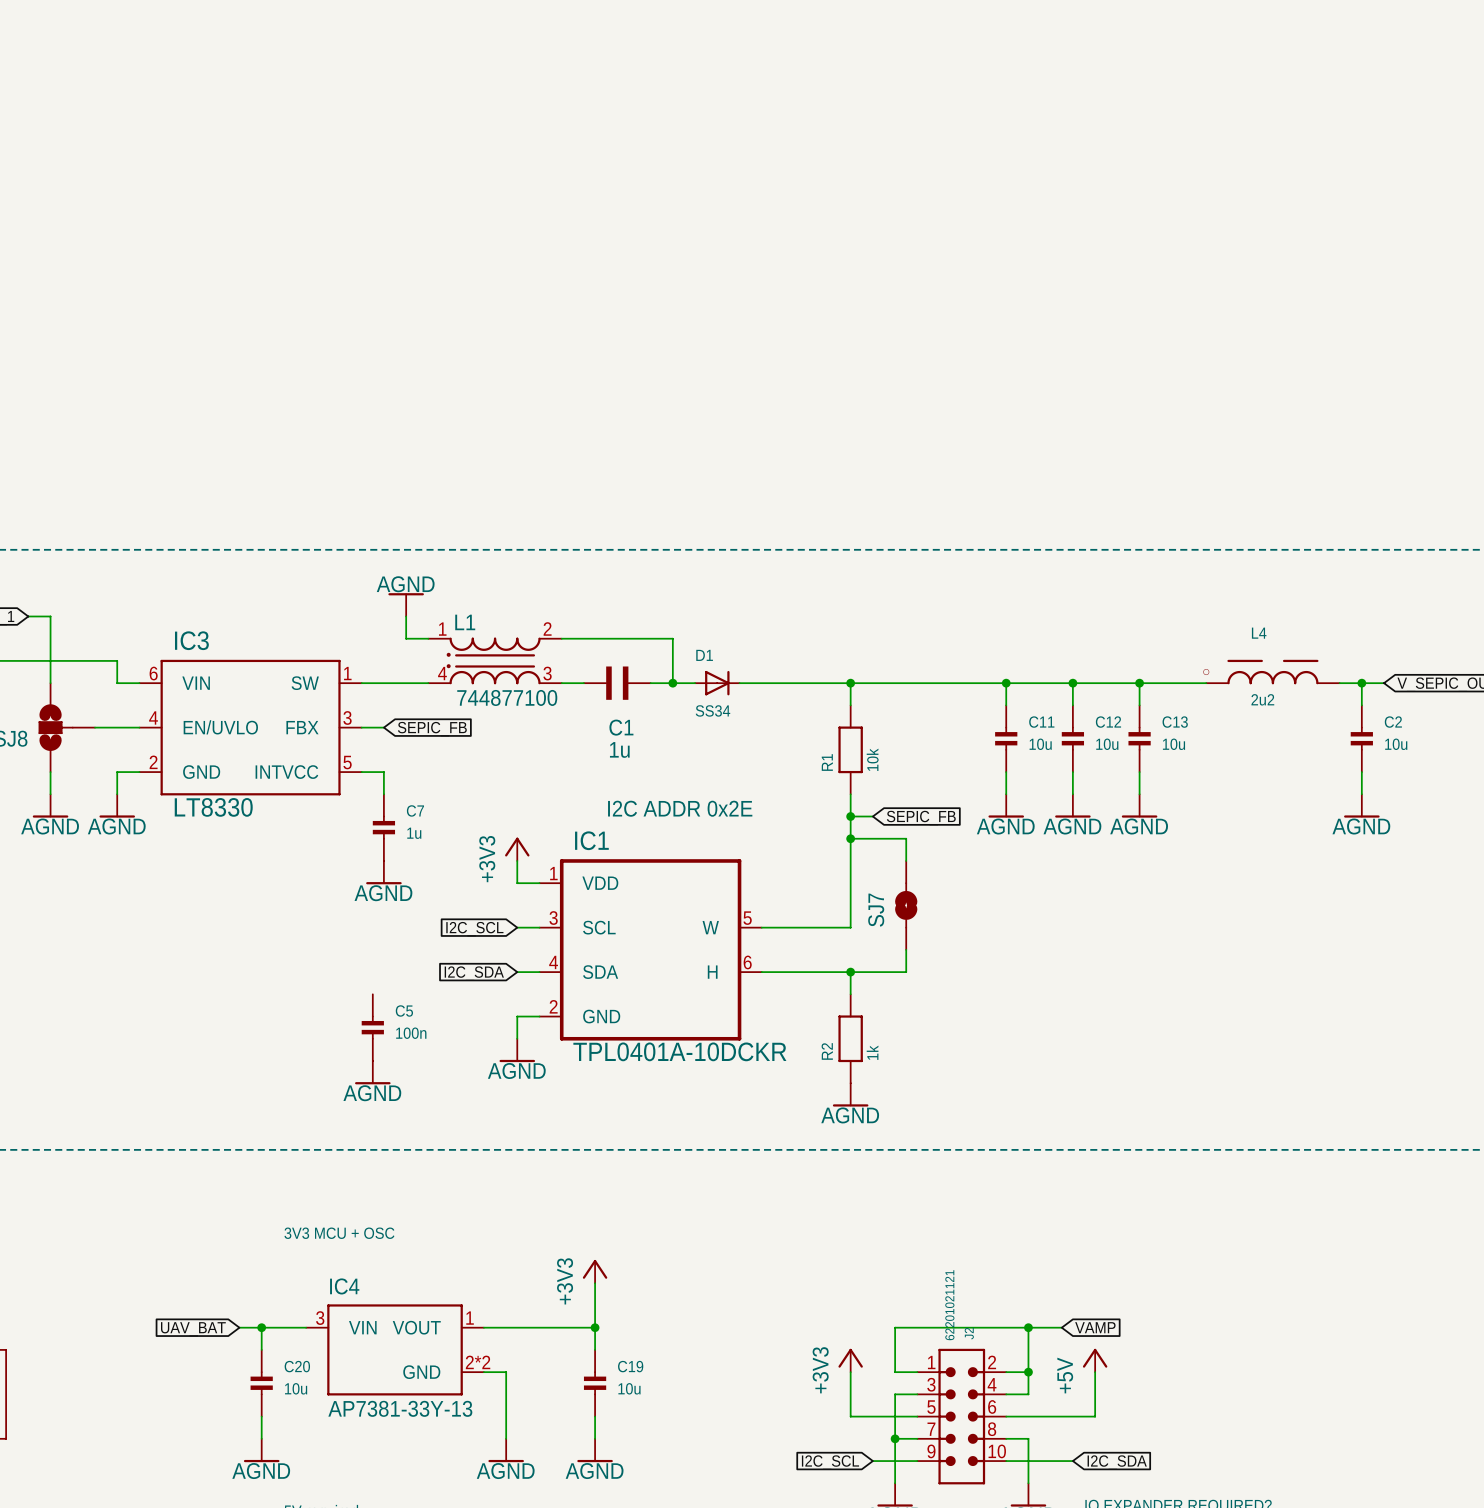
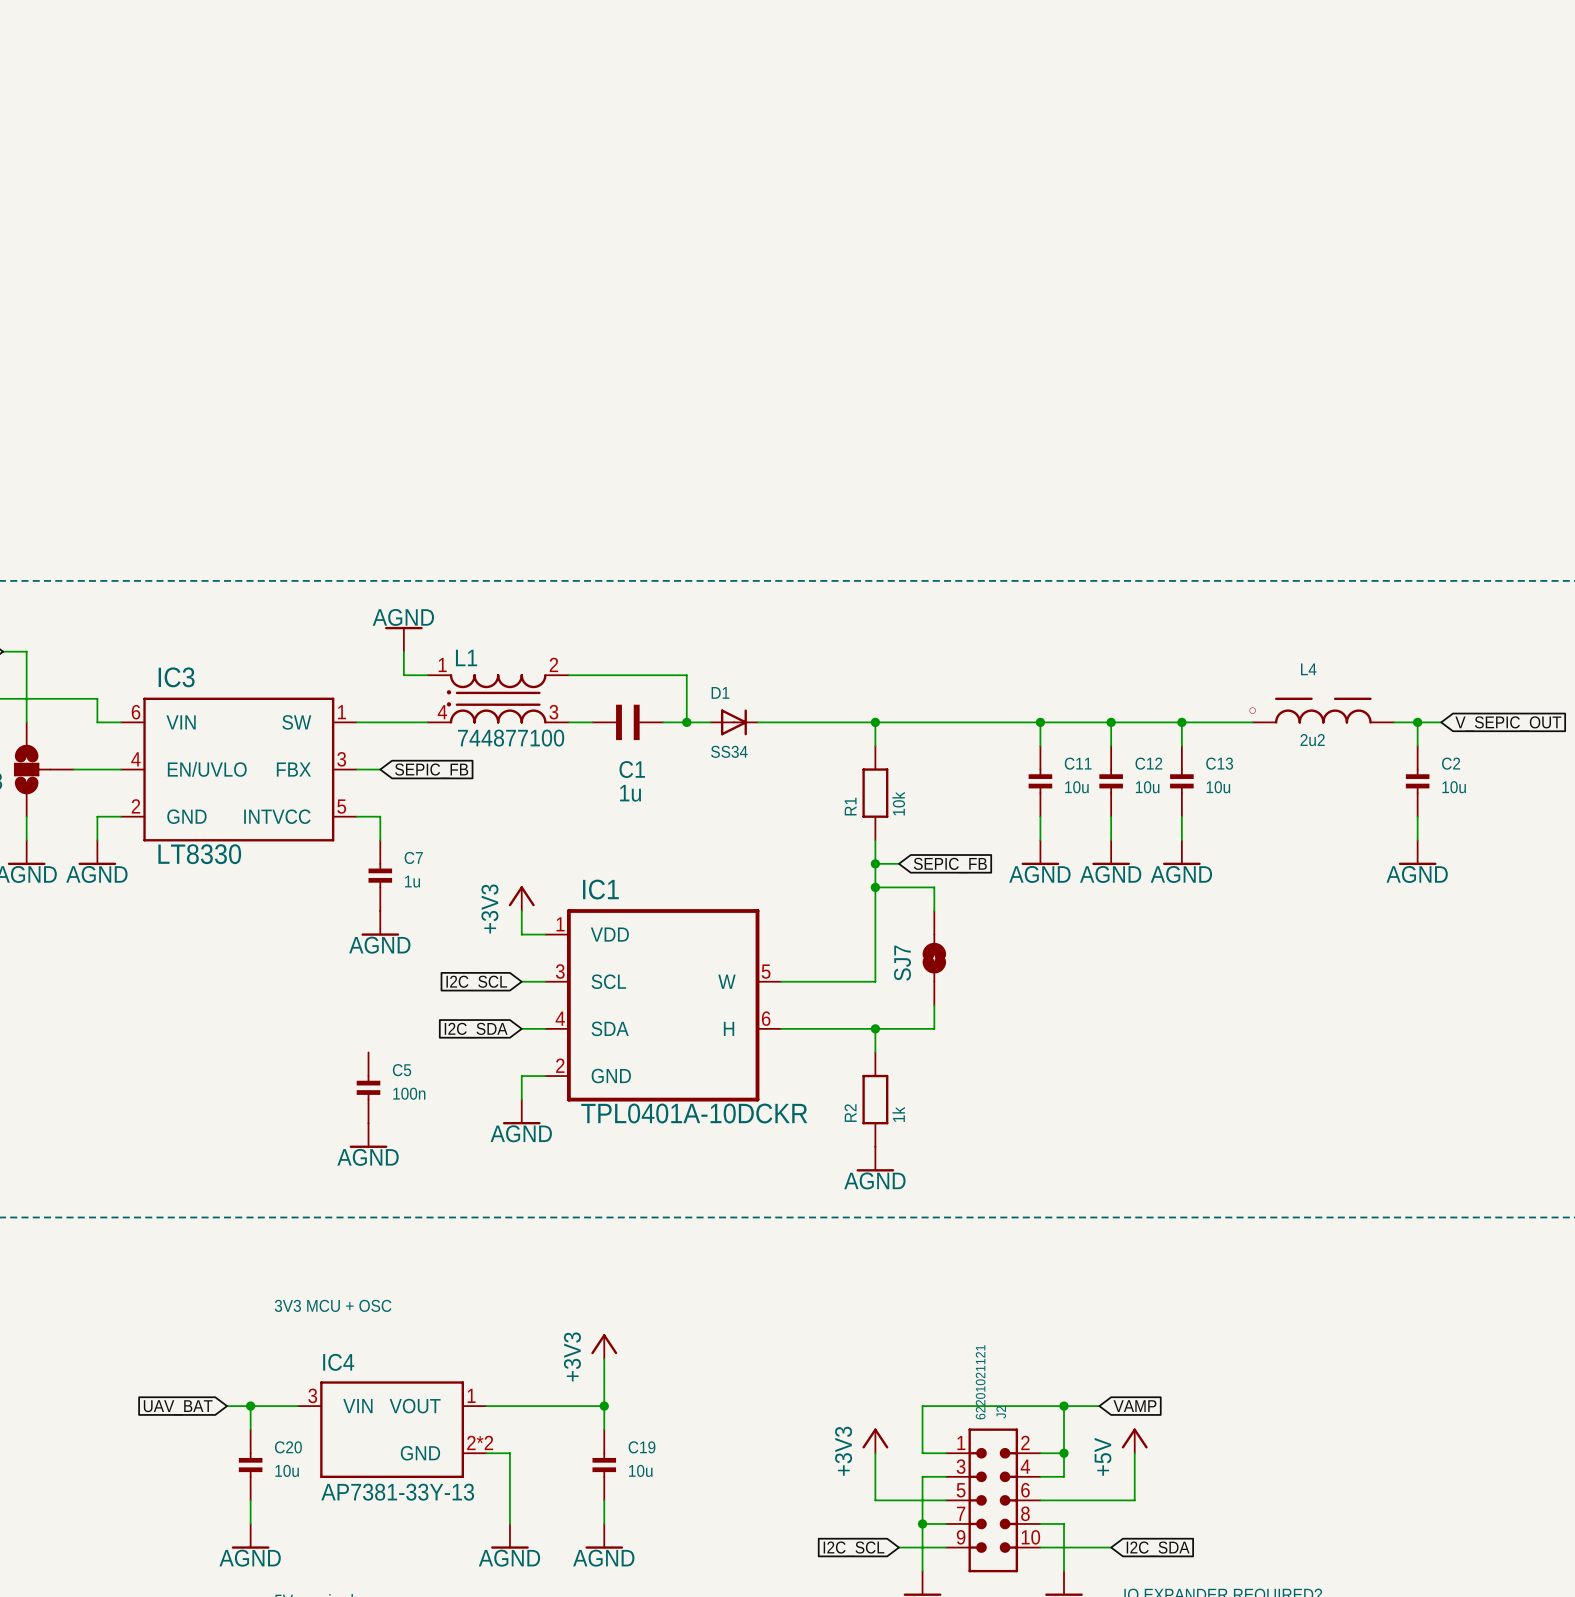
text: I2C ADDR 0x2E (680, 808) -> none

